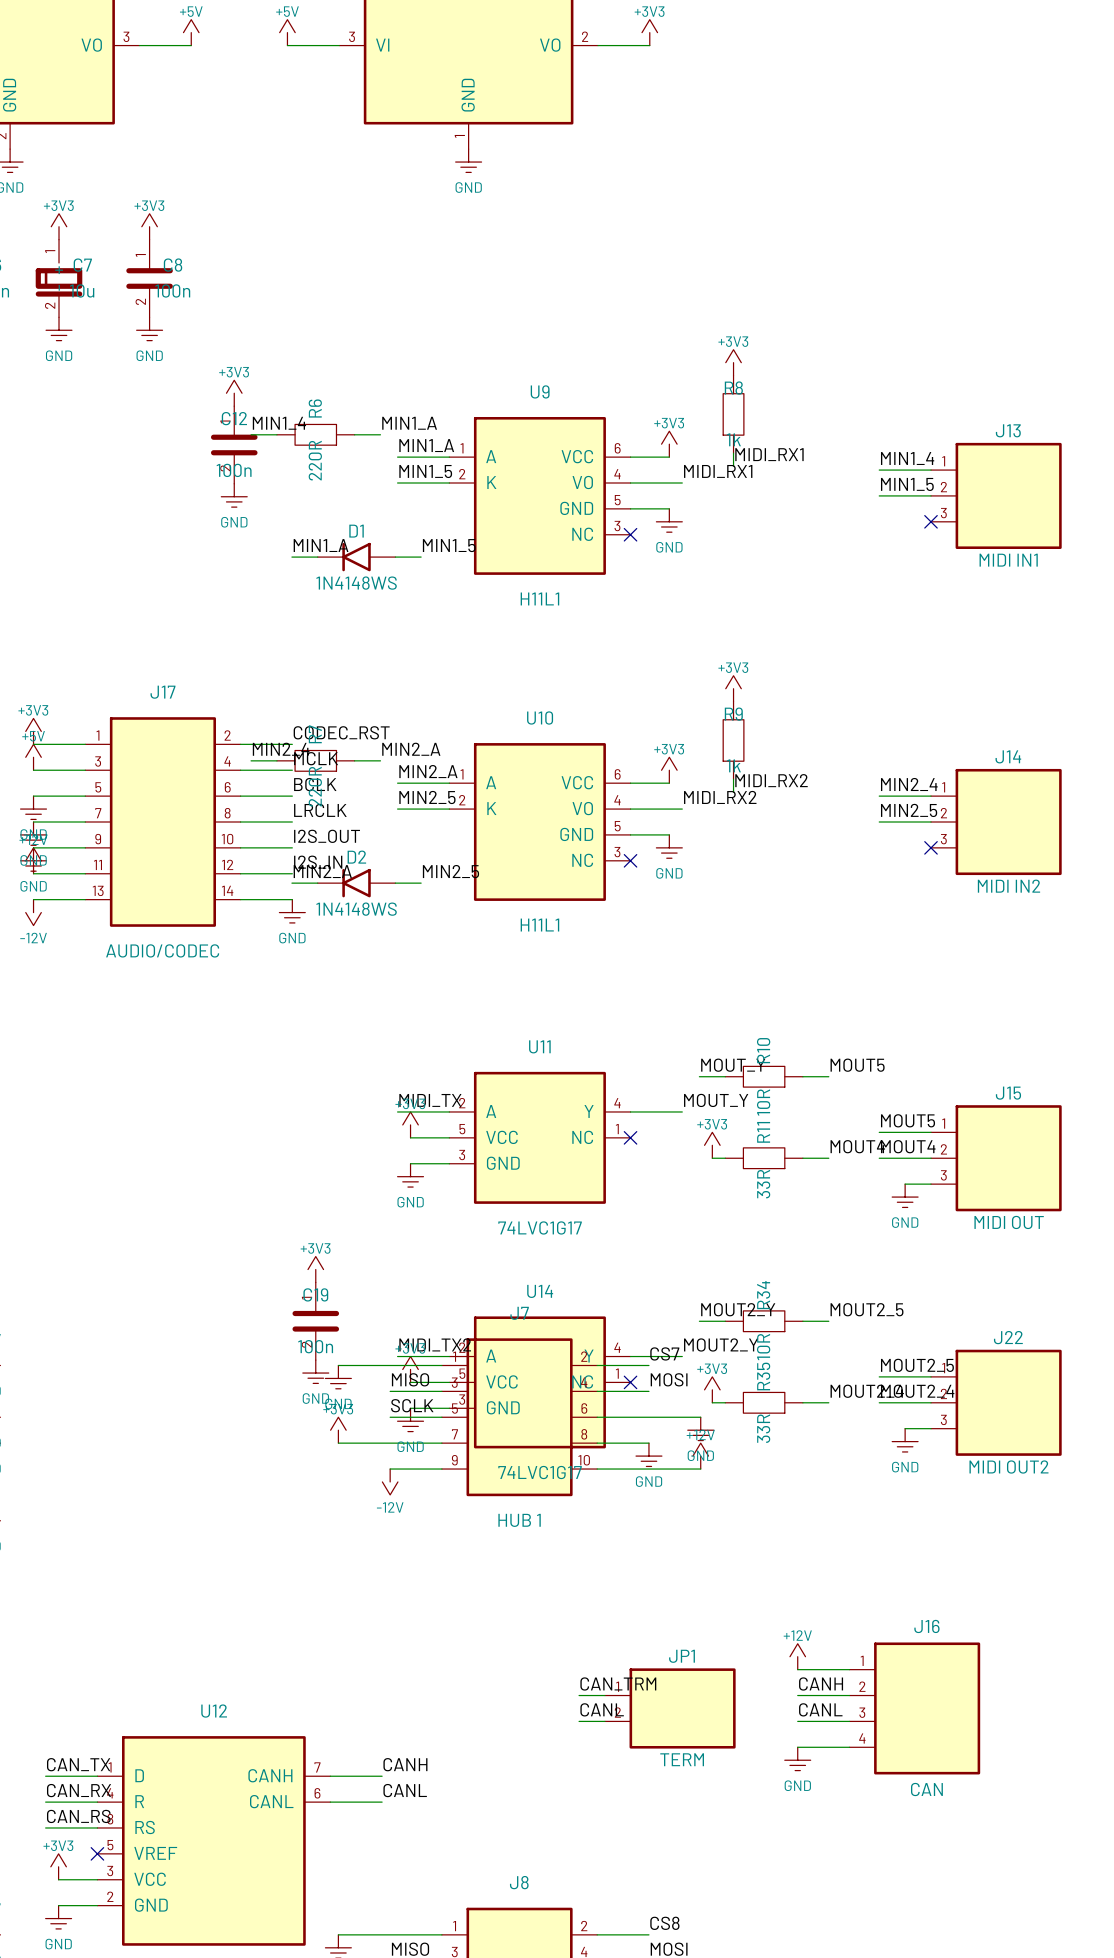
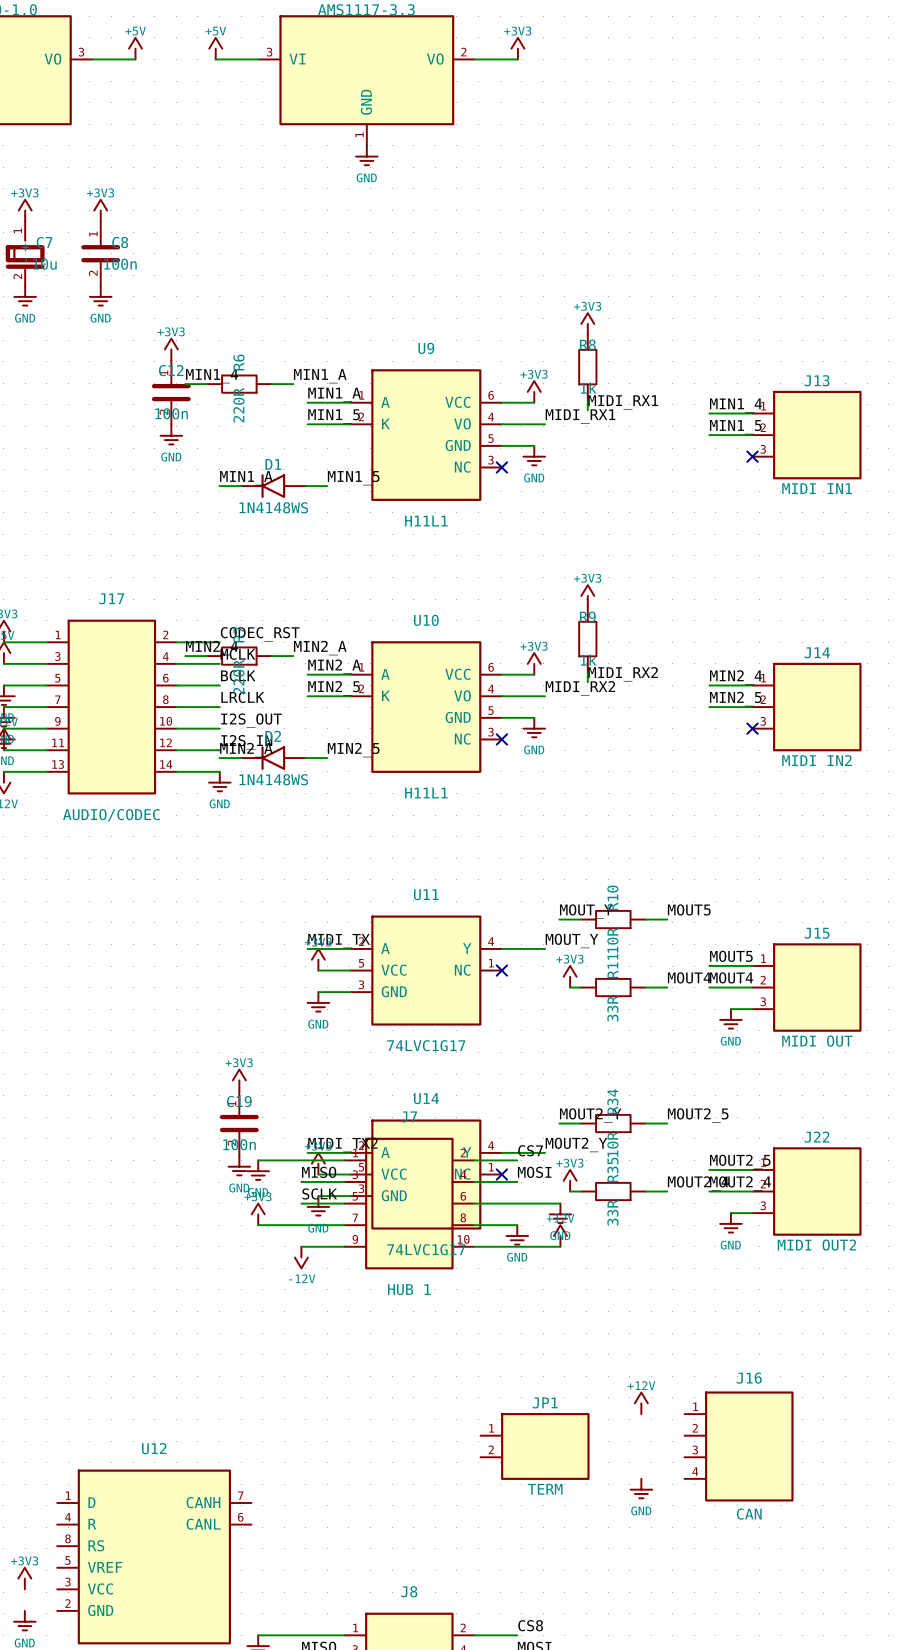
wire: (797, 1669) (849, 1669) -> none
label: CAN_TRM (618, 1683) -> none
label: CANH (821, 1683) -> none
wire: (579, 1695) (604, 1695) -> none
wire: (797, 1695) (849, 1695) -> none
label: CANL (602, 1709) -> none
label: CANL (820, 1709) -> none
wire: (579, 1721) (604, 1721) -> none
wire: (797, 1721) (849, 1721) -> none
wire: (797, 1747) (849, 1747) -> none
label: CAN_TX (78, 1764) -> none
label: CANH (405, 1764) -> none
wire: (45, 1776) (97, 1776) -> none
wire: (330, 1776) (382, 1776) -> none
label: CAN_RX (79, 1790) -> none
label: CANL (405, 1790) -> none
wire: (45, 1802) (97, 1802) -> none
wire: (330, 1802) (382, 1802) -> none
label: CAN_RS (78, 1816) -> none
wire: (45, 1827) (97, 1827) -> none
no-connect mark: (97, 1853) -> none
wire: (58, 1879) (97, 1879) -> none
wire: (58, 1905) (97, 1905) -> none

